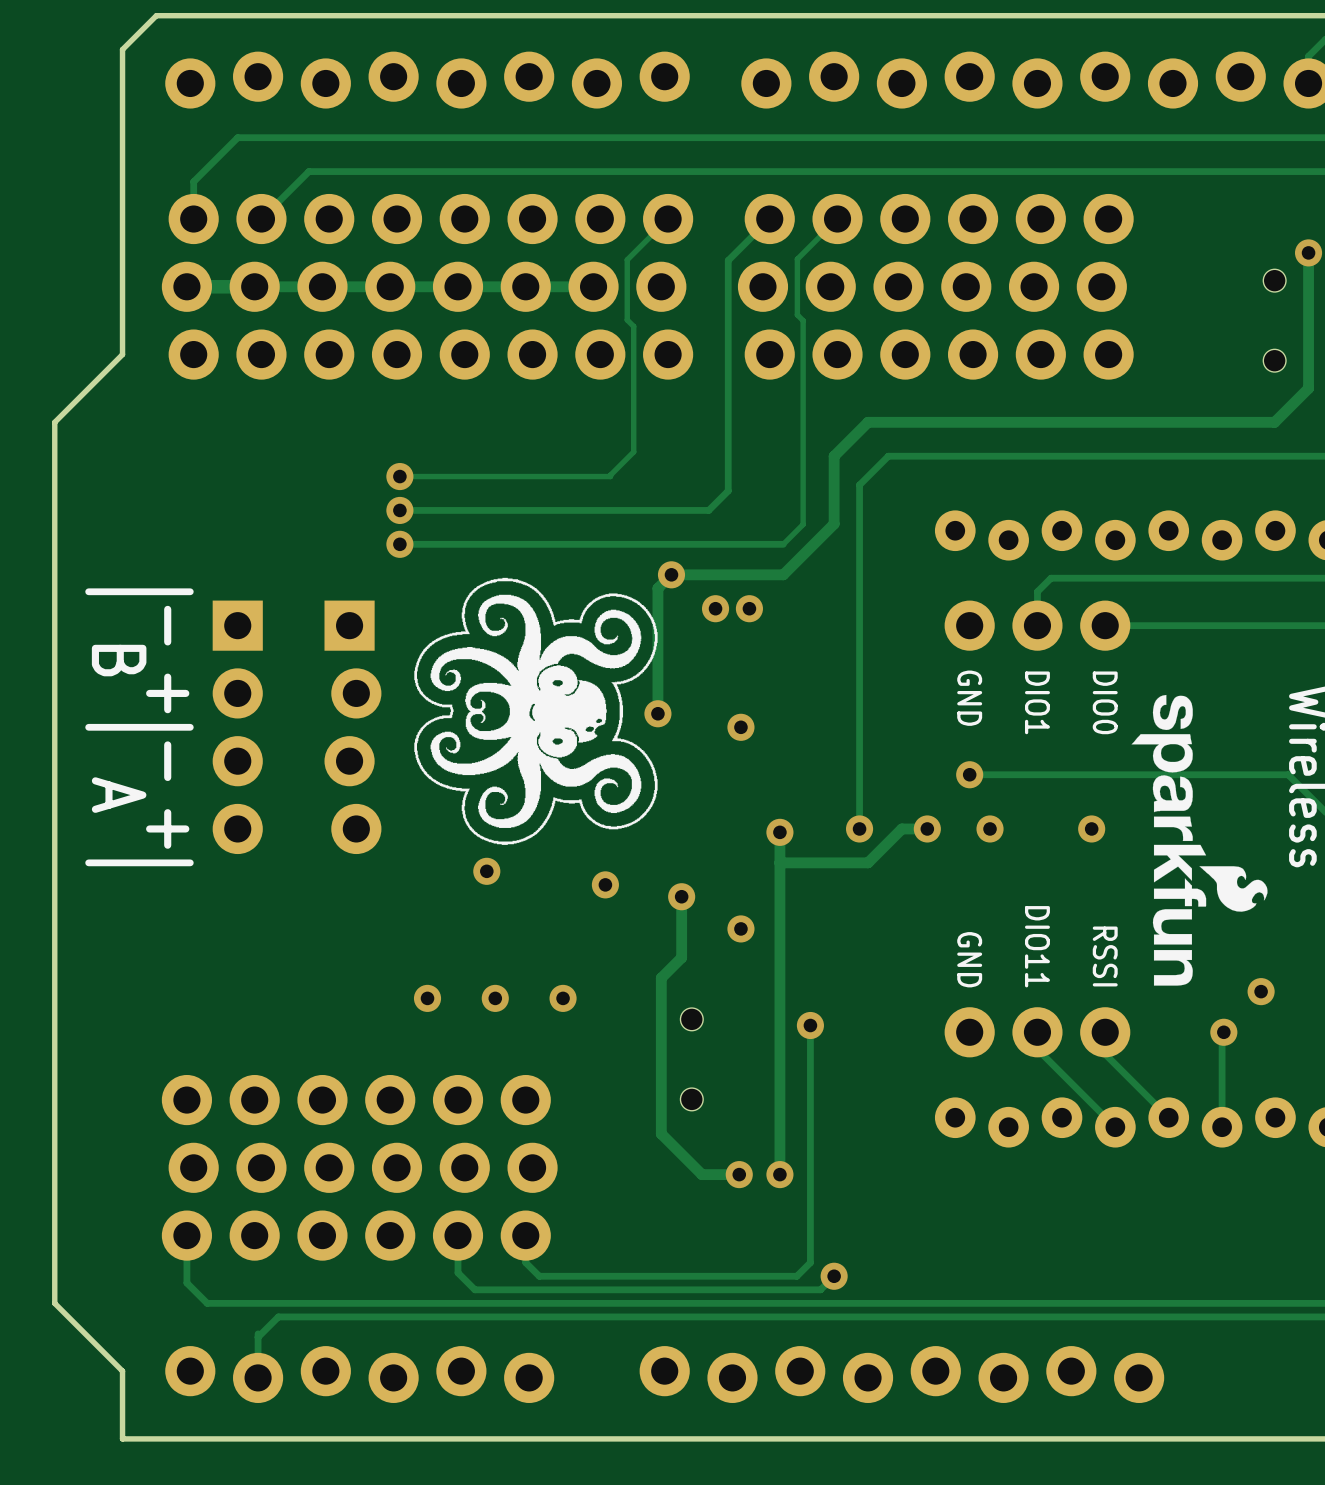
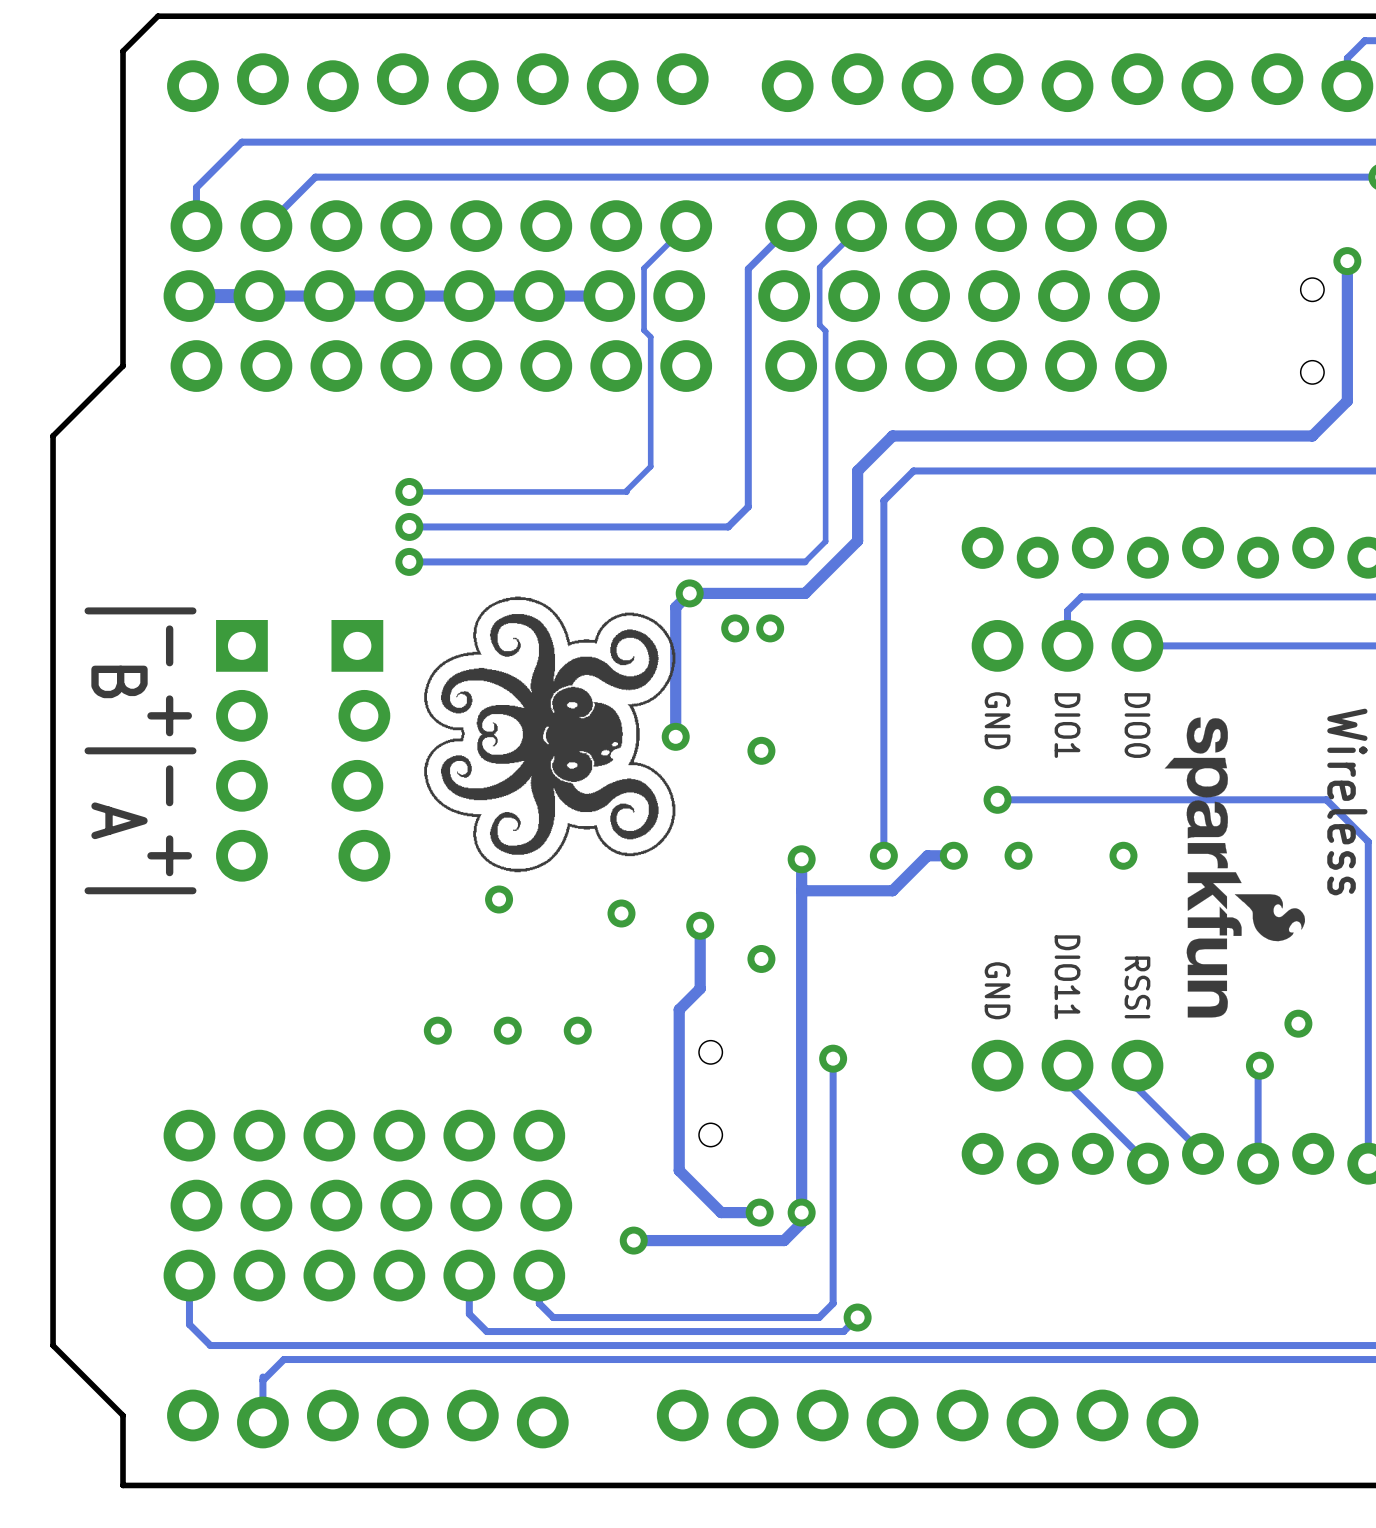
track: none -> (801, 1212) (801, 1223) (784, 1240) (633, 1240)
via: none -> (633, 1240)

